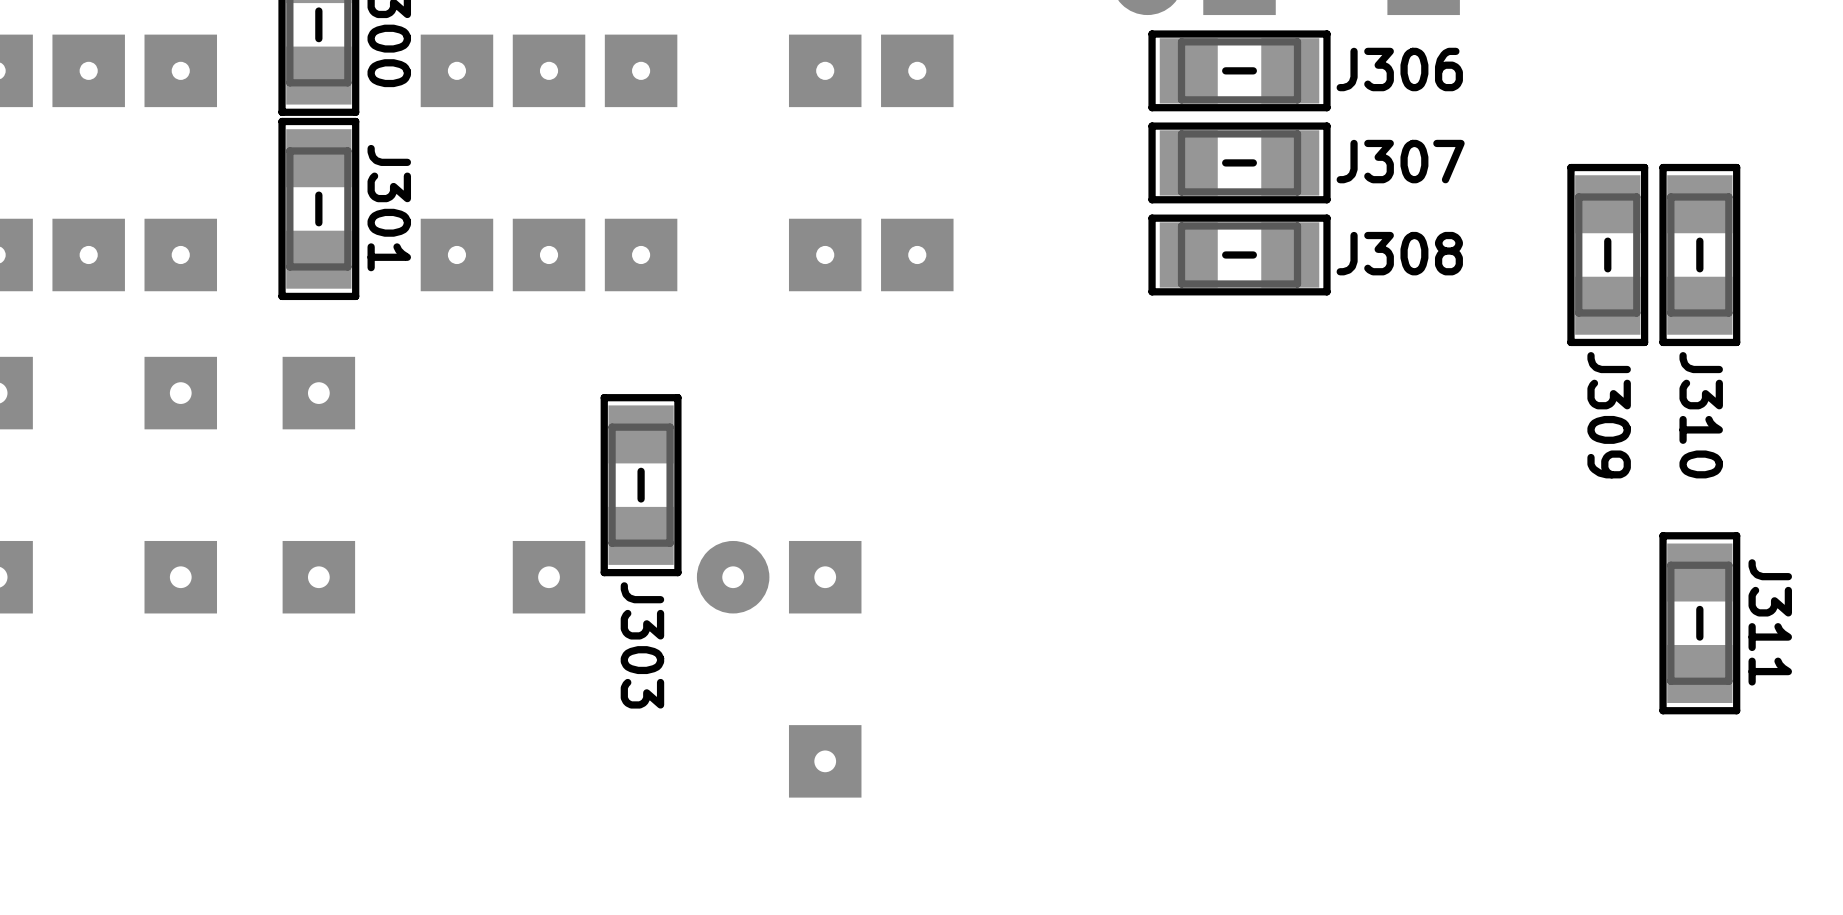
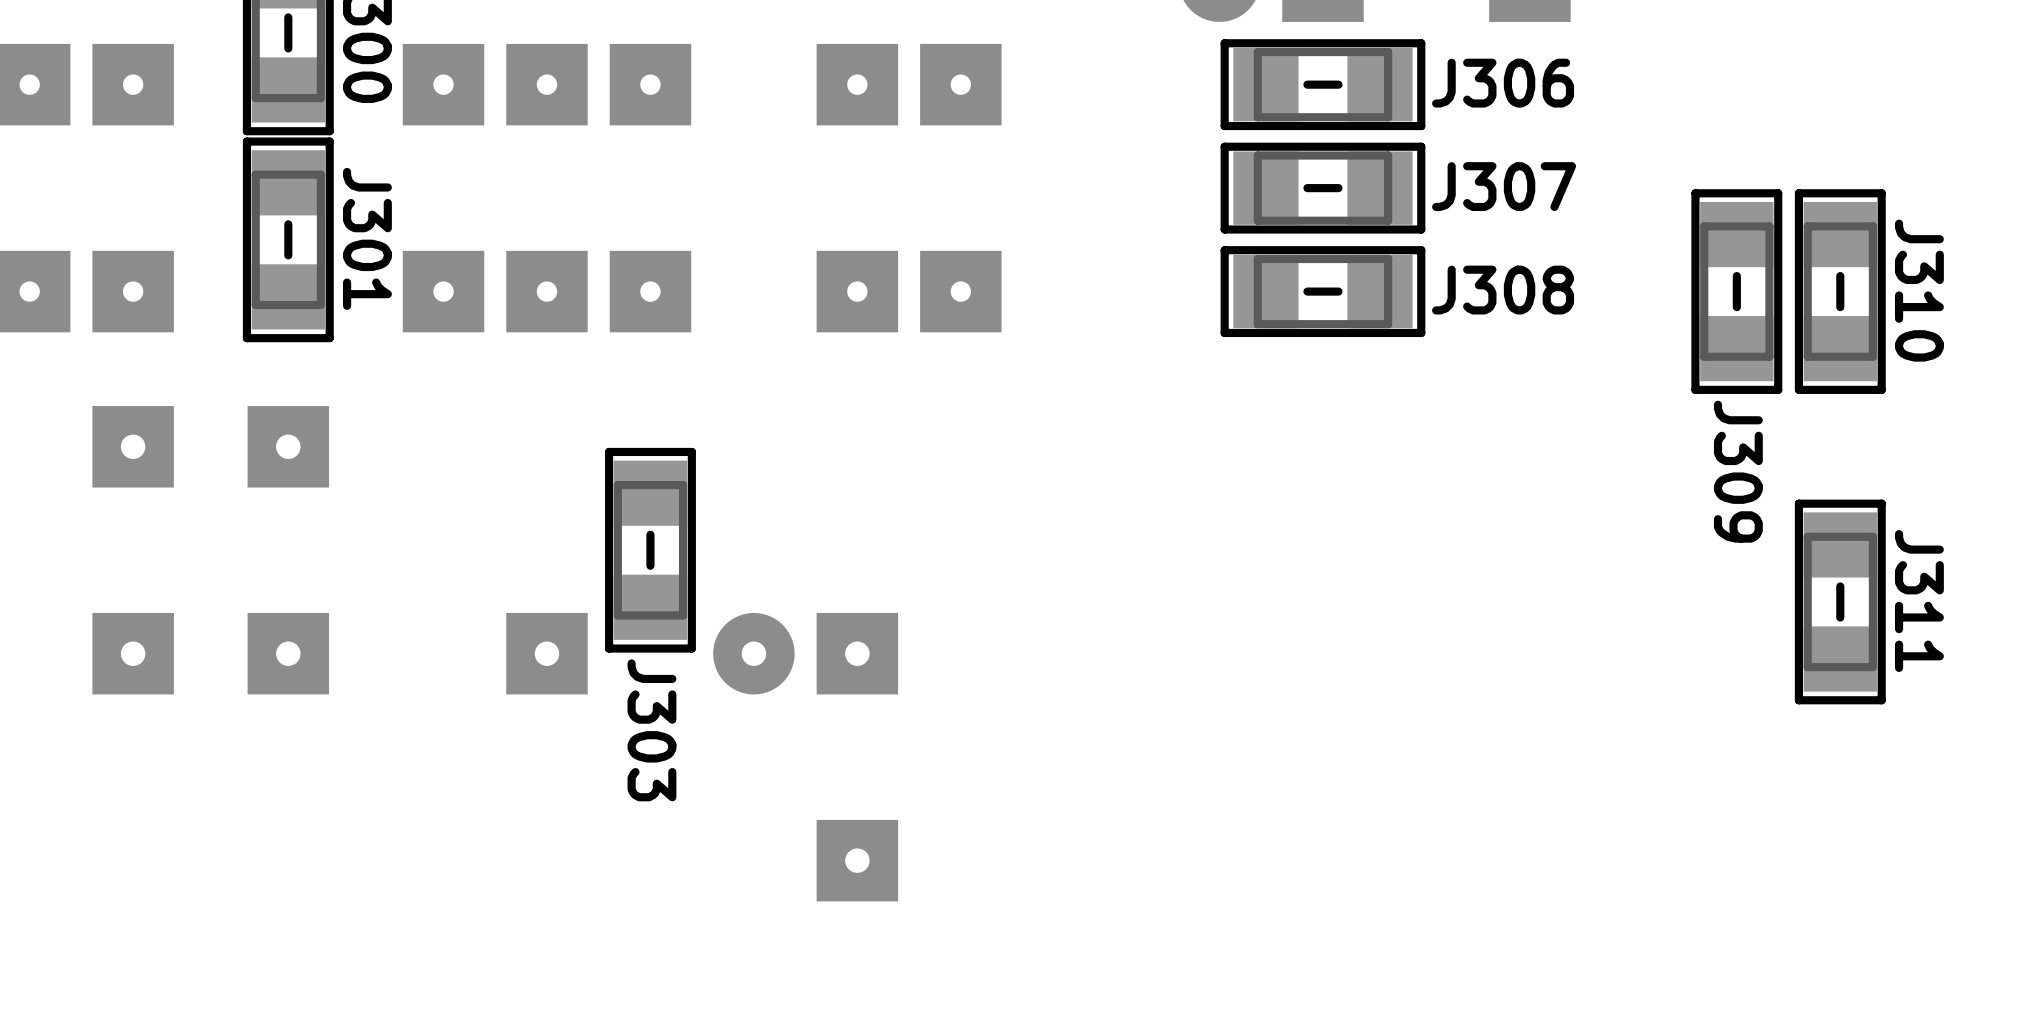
J310 name position: J310 (1701, 415) -> J310 (1919, 290)
J311 position: (1699, 623) -> (1840, 601)

